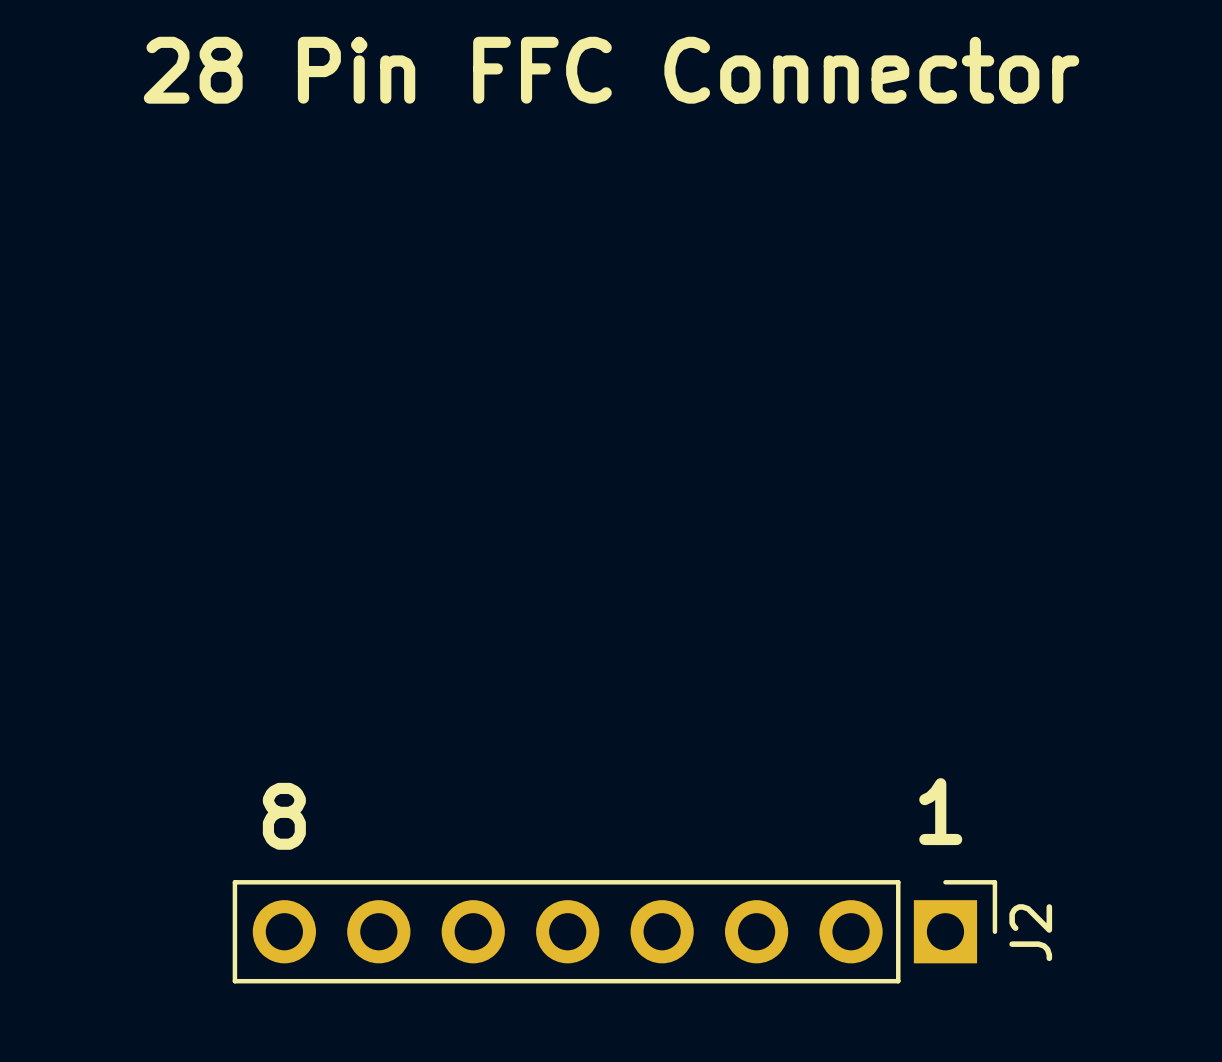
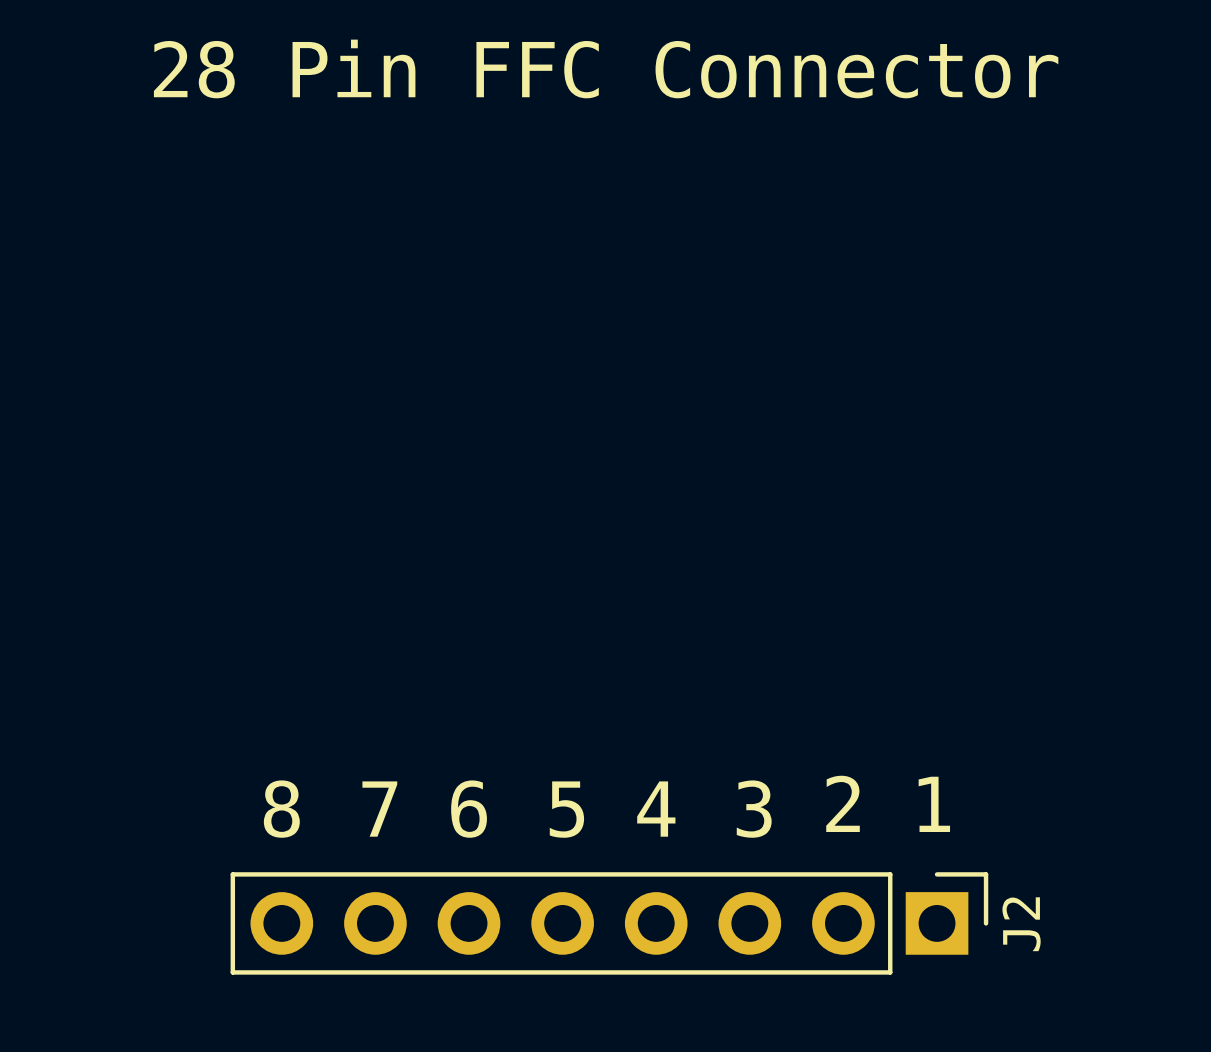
text: none -> 2 (843, 803)
text: none -> 4 (656, 809)
text: none -> 7 (379, 809)
text: none -> 6 (469, 809)
text: none -> 5 (566, 809)
text: none -> 3 (754, 809)

